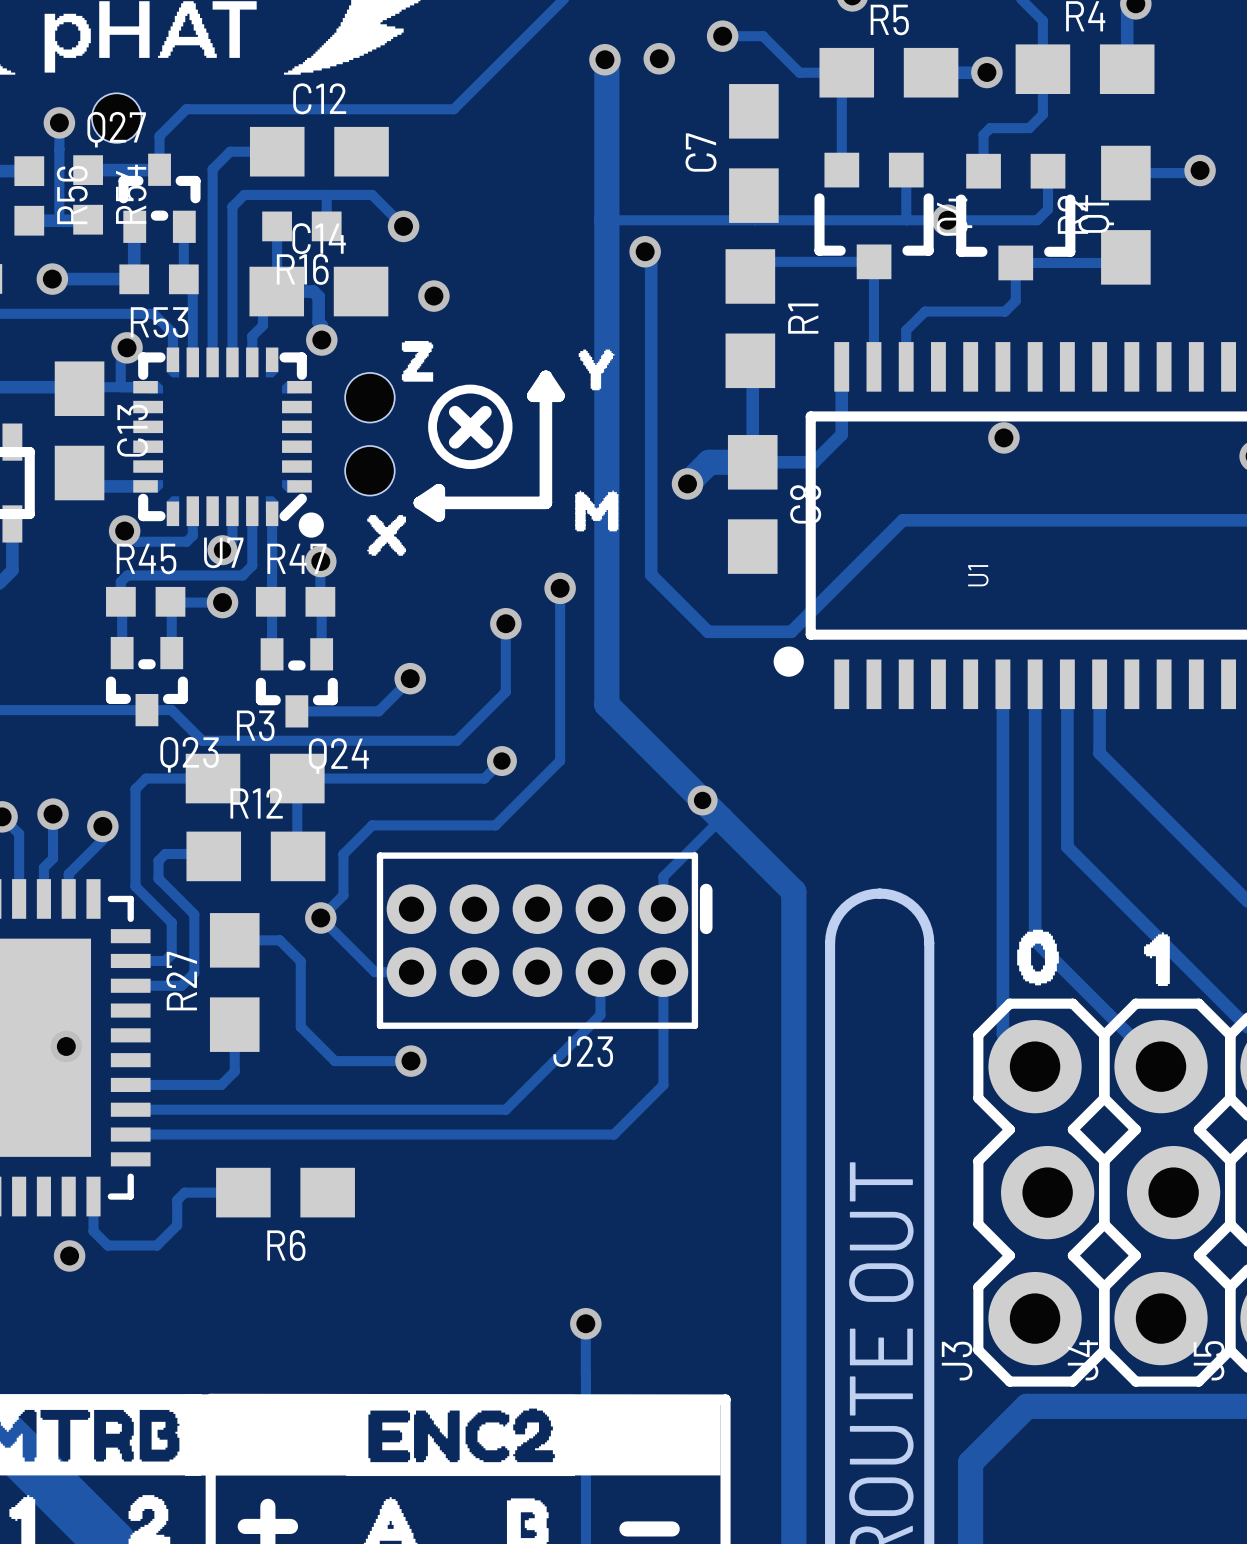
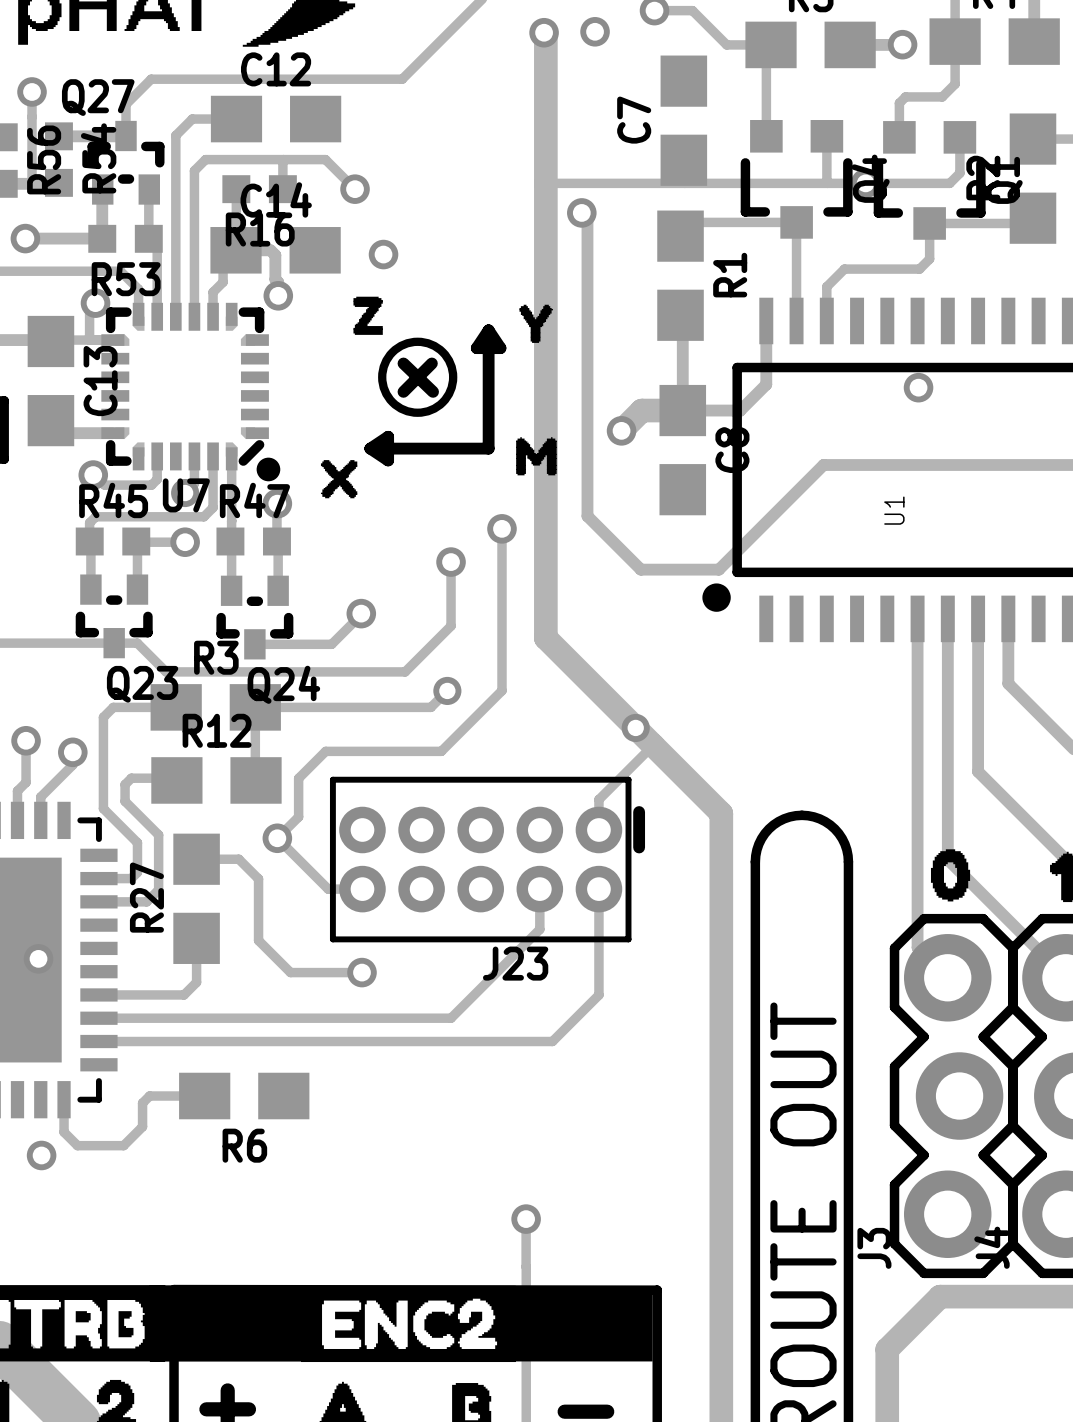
hole: (116, 118) -> none
hole: (369, 397) -> none
hole: (369, 470) -> none

